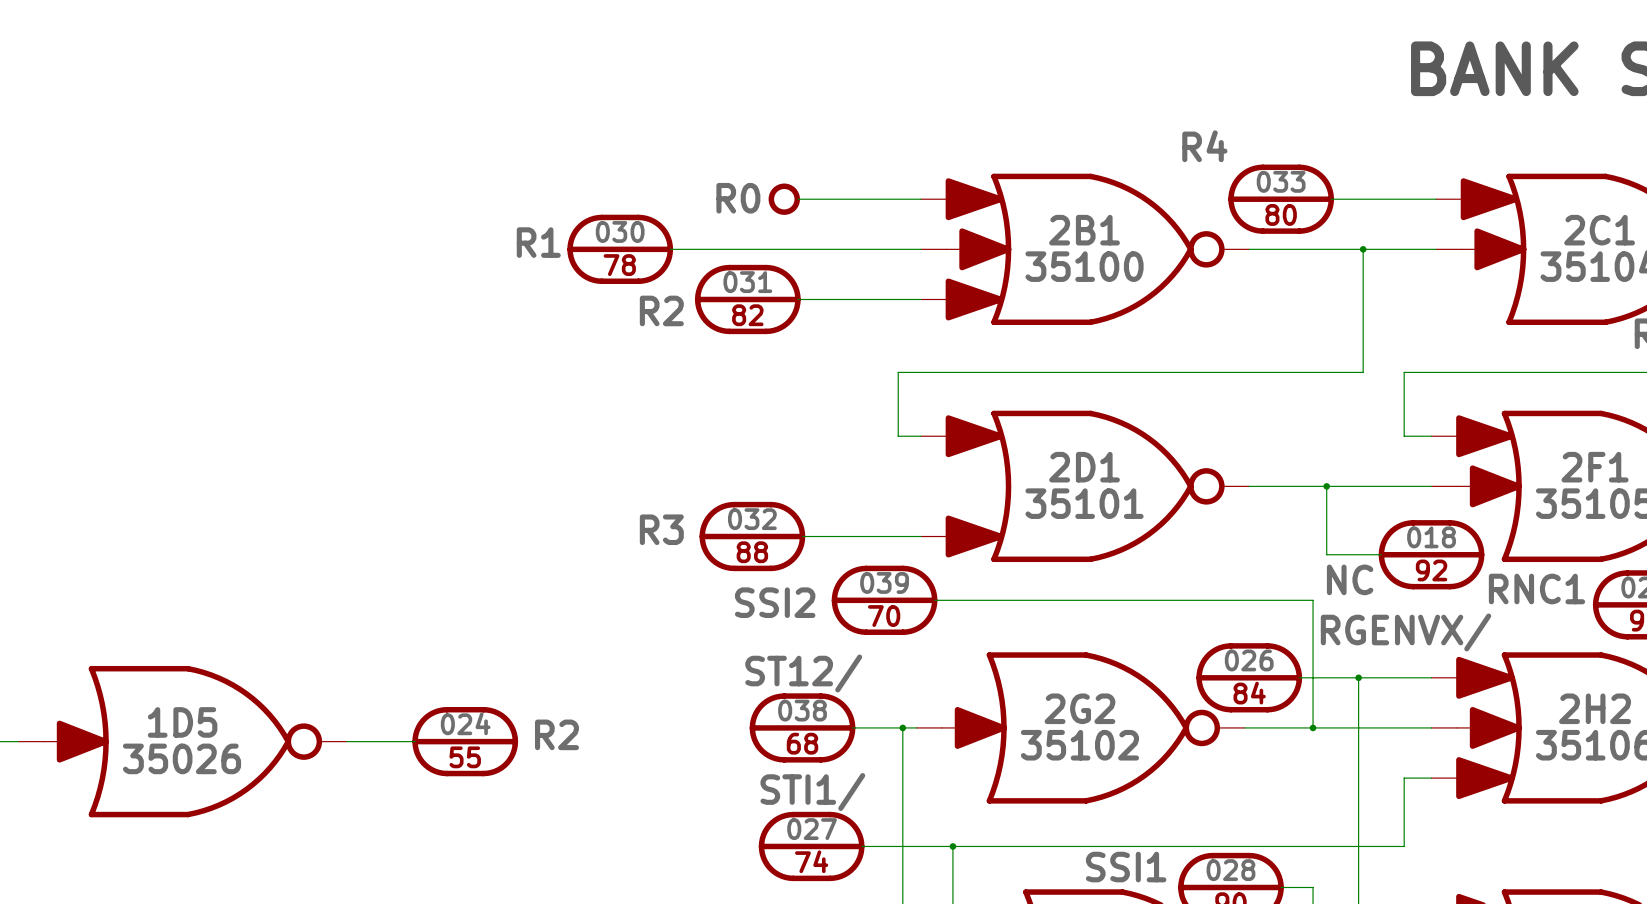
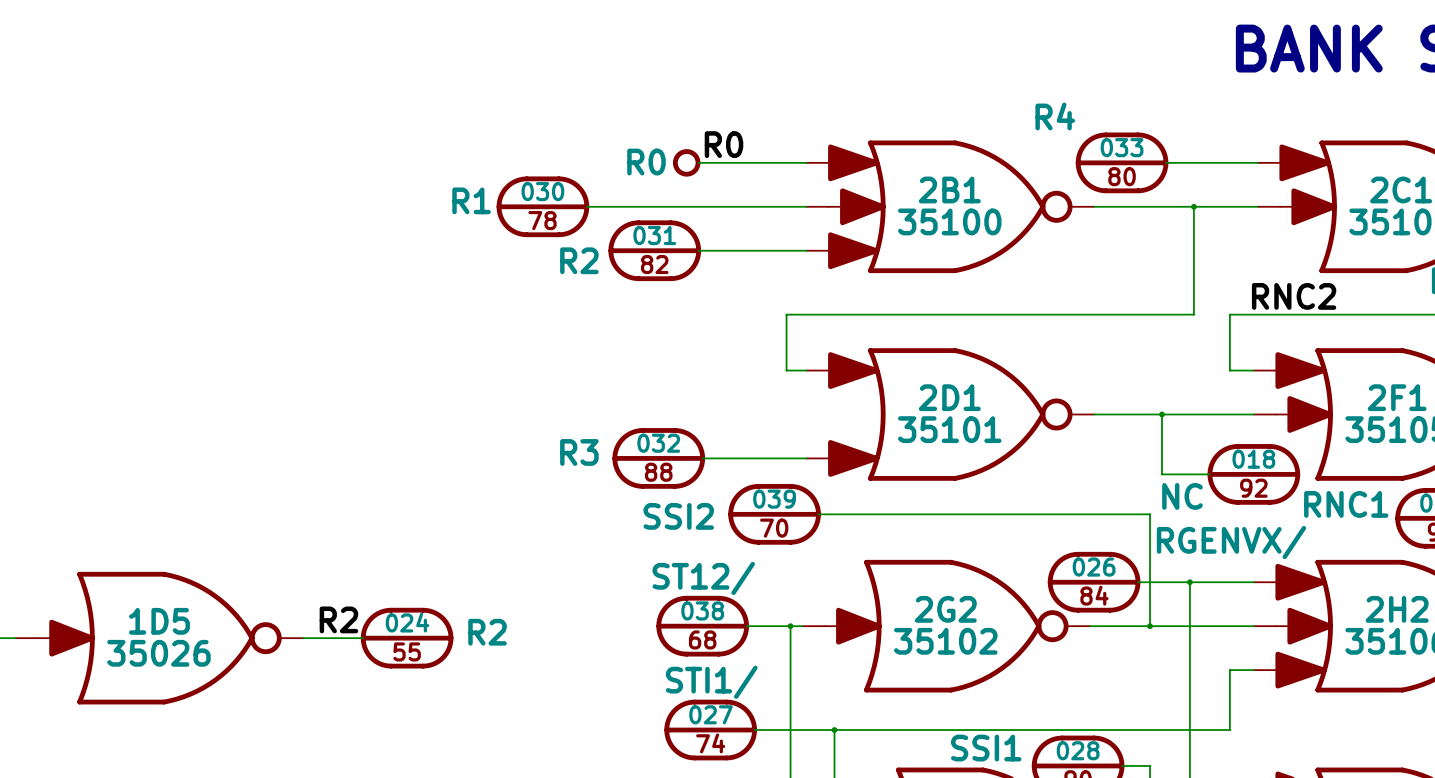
label: none -> R0 (723, 144)
label: none -> RNC2 (1294, 296)
label: none -> R2 (338, 619)

